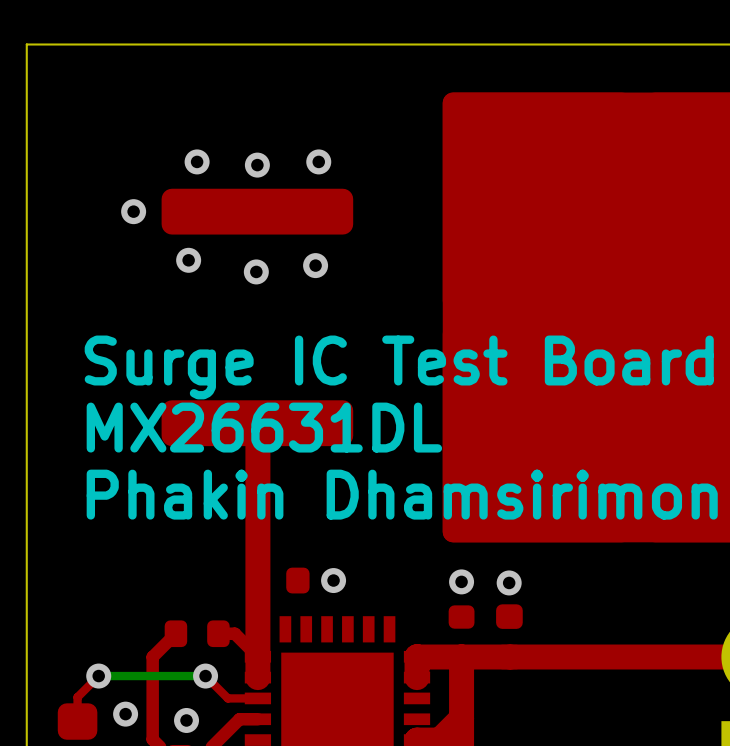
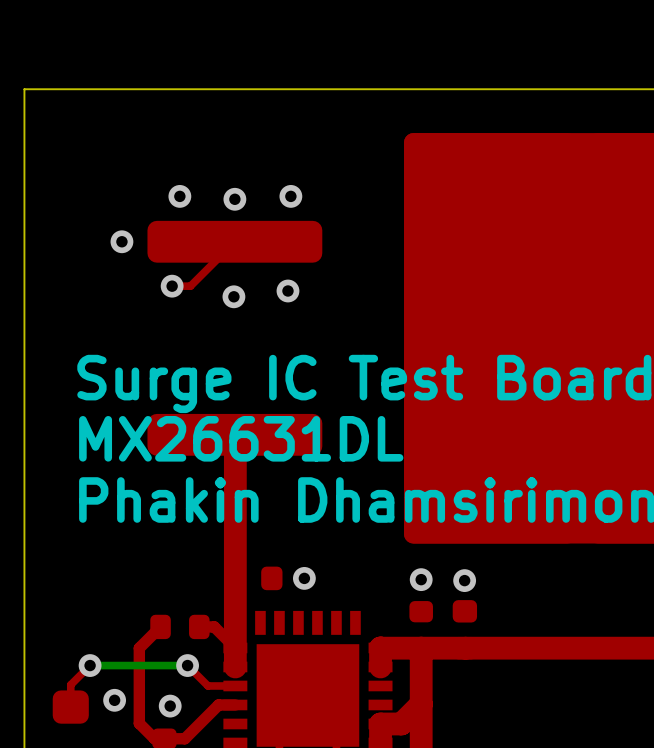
top track: none -> (234, 241) (190, 286) (172, 286)

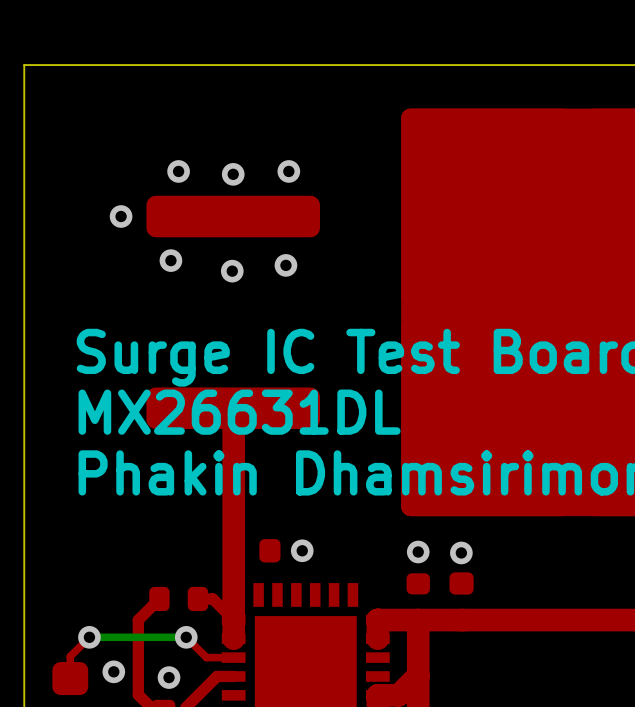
top track: (234, 241) (190, 286) (172, 286) -> none

